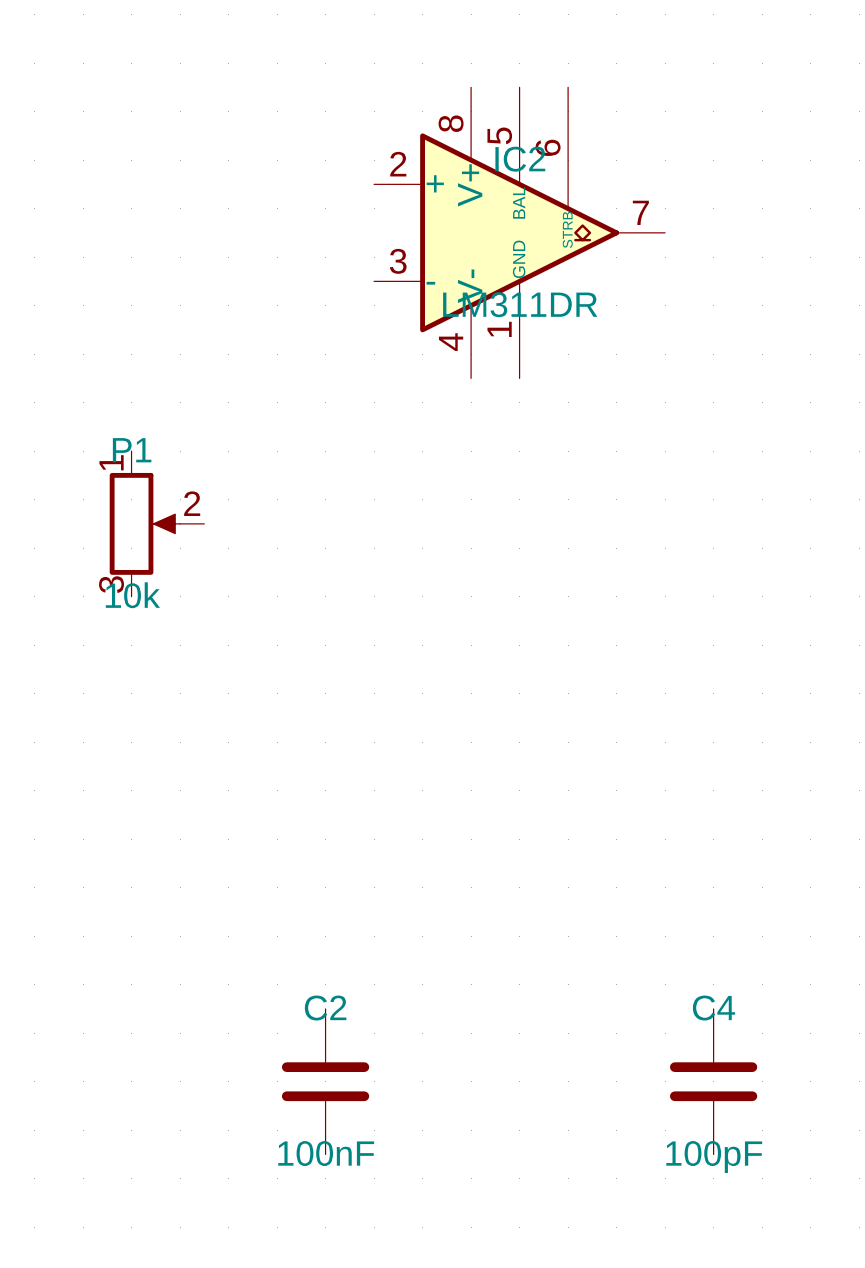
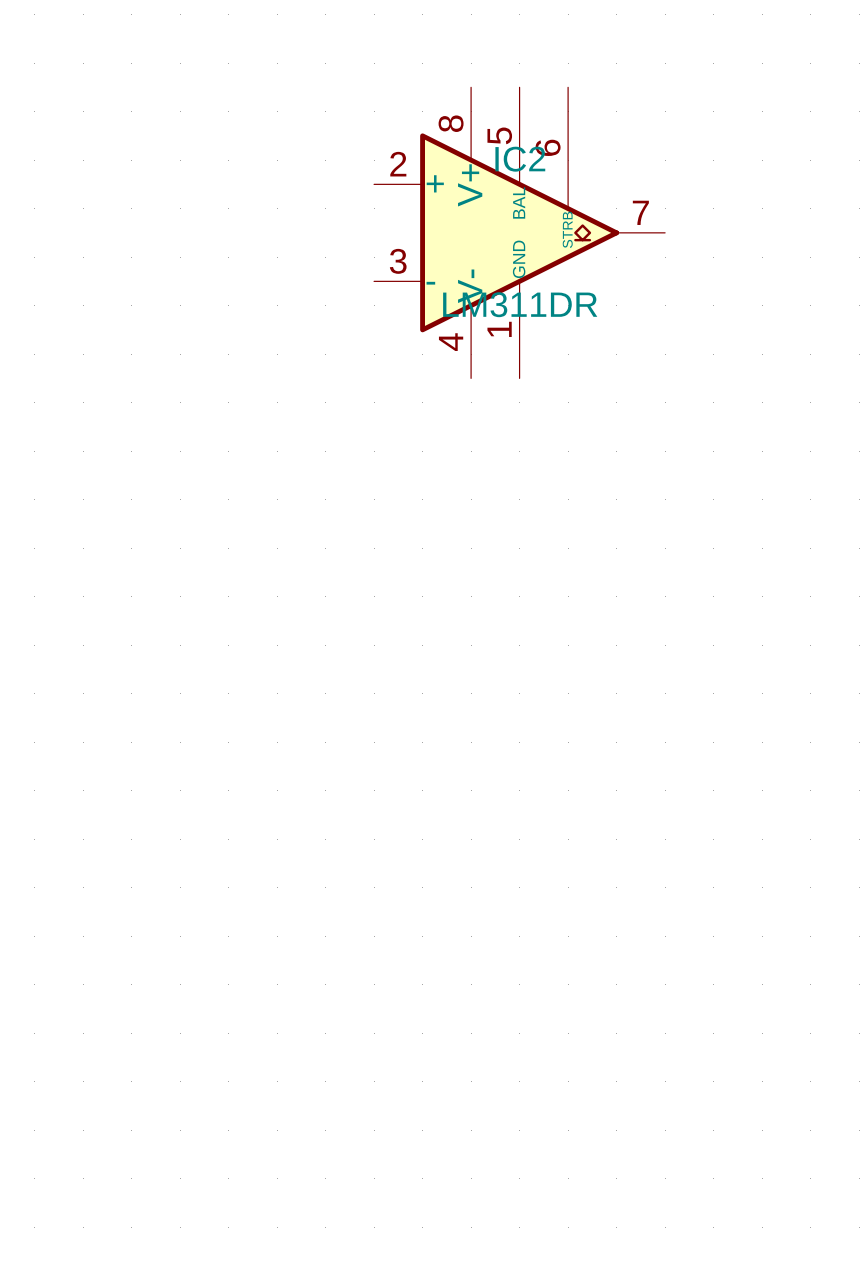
P1: 10k (157, 523) -> none
C2: 100nF (325, 1081) -> none
C4: 100pF (713, 1081) -> none

